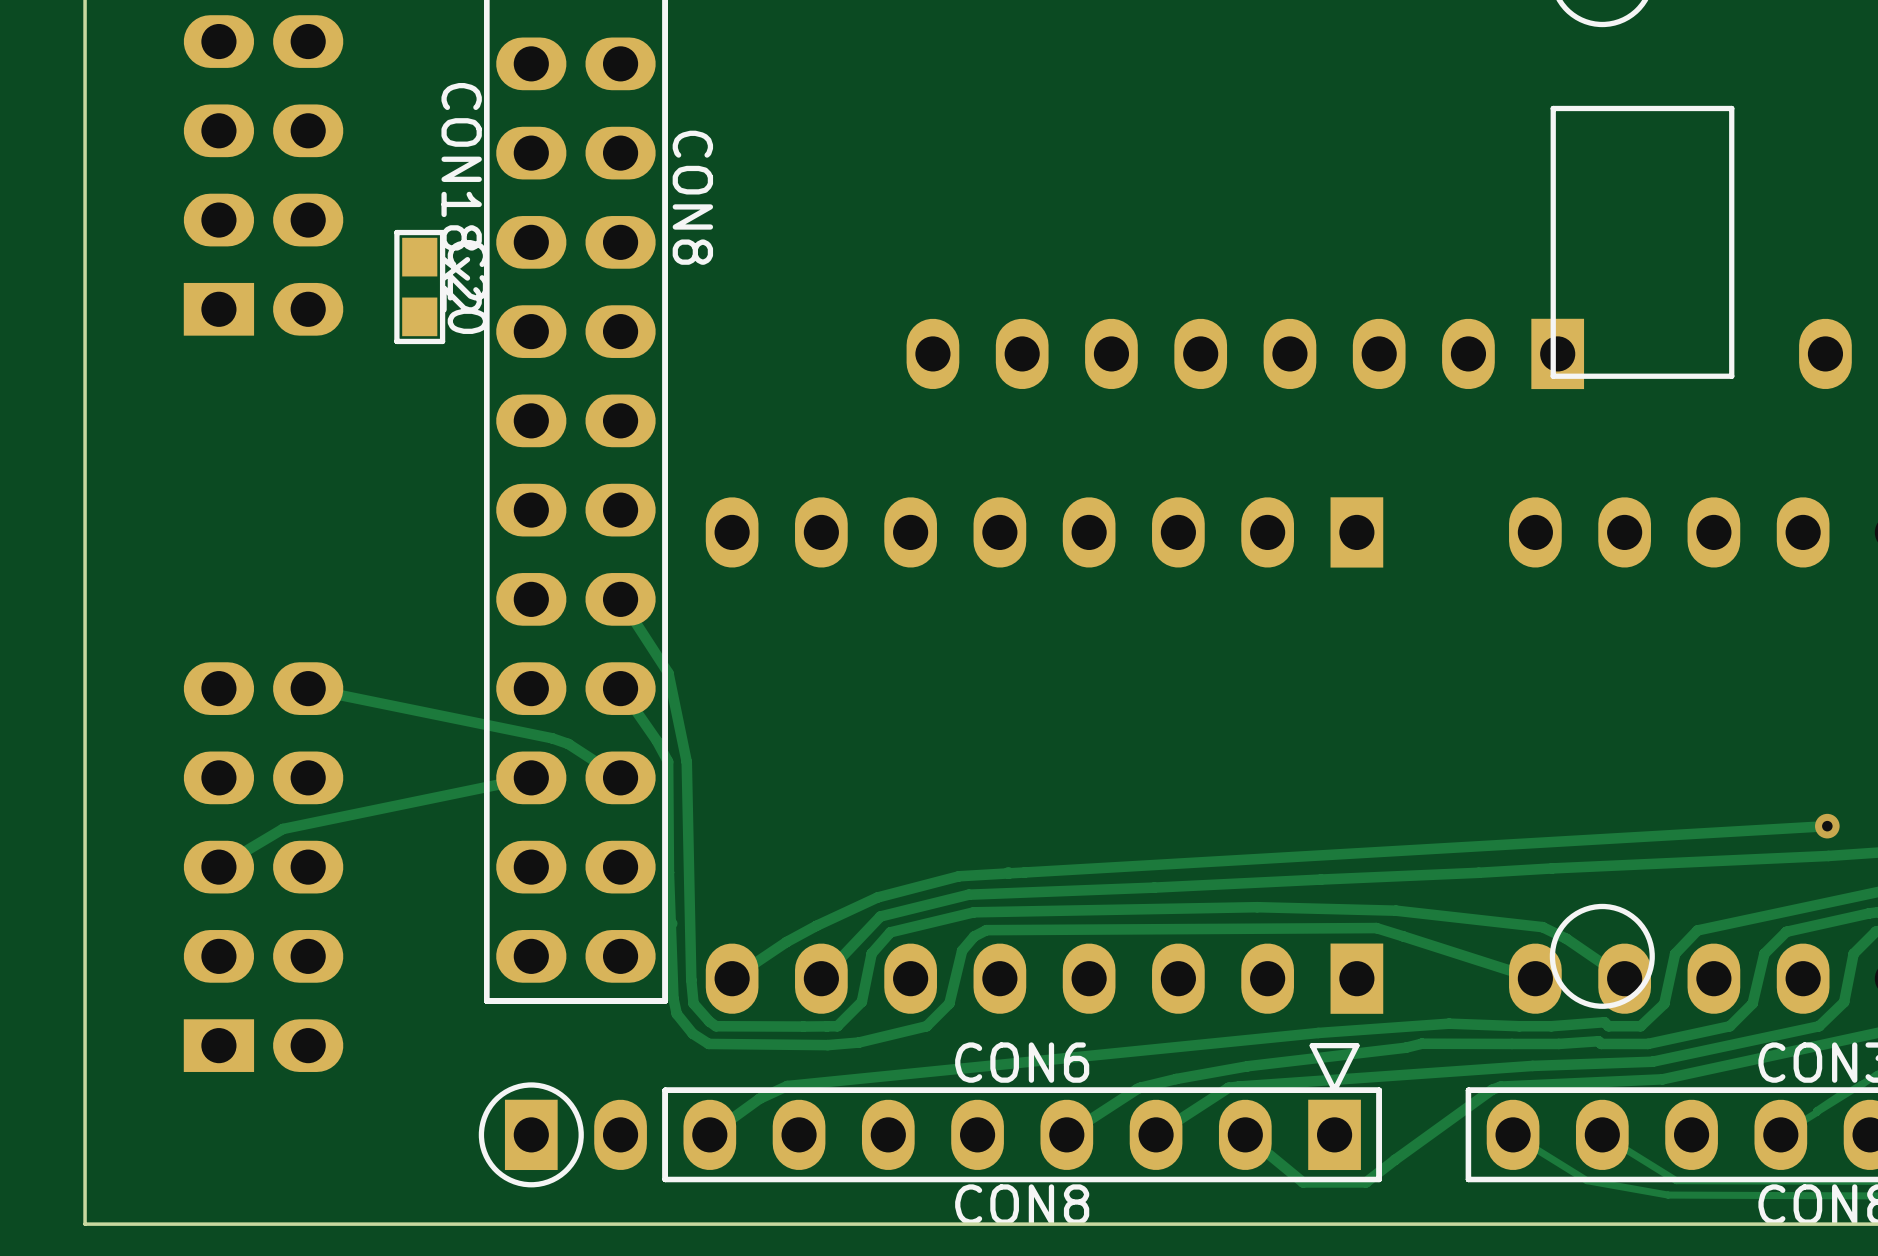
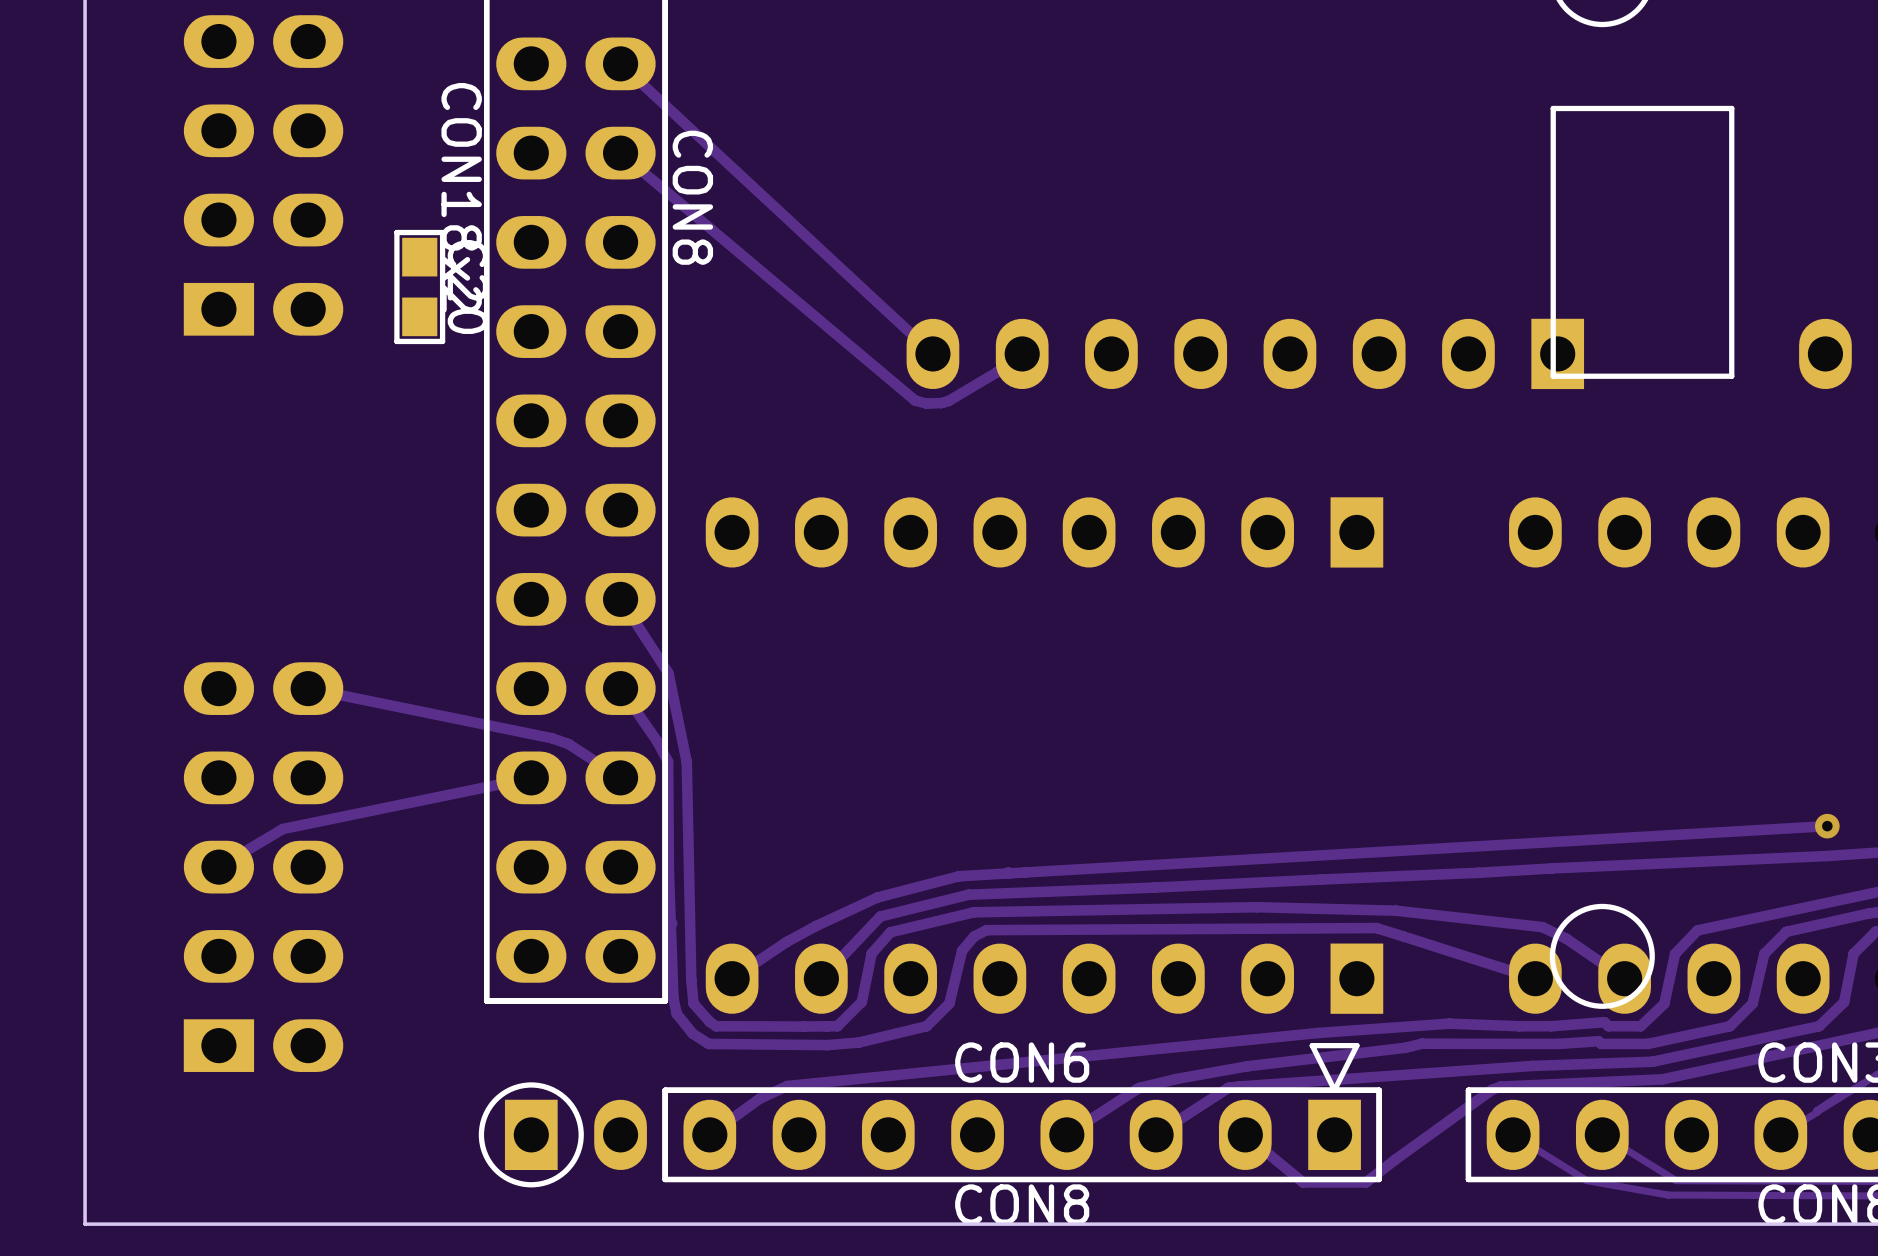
track: none -> (620, 63) (932, 353)
track: none -> (620, 153) (915, 400) (926, 403) (948, 400) (996, 372) (1022, 353)

